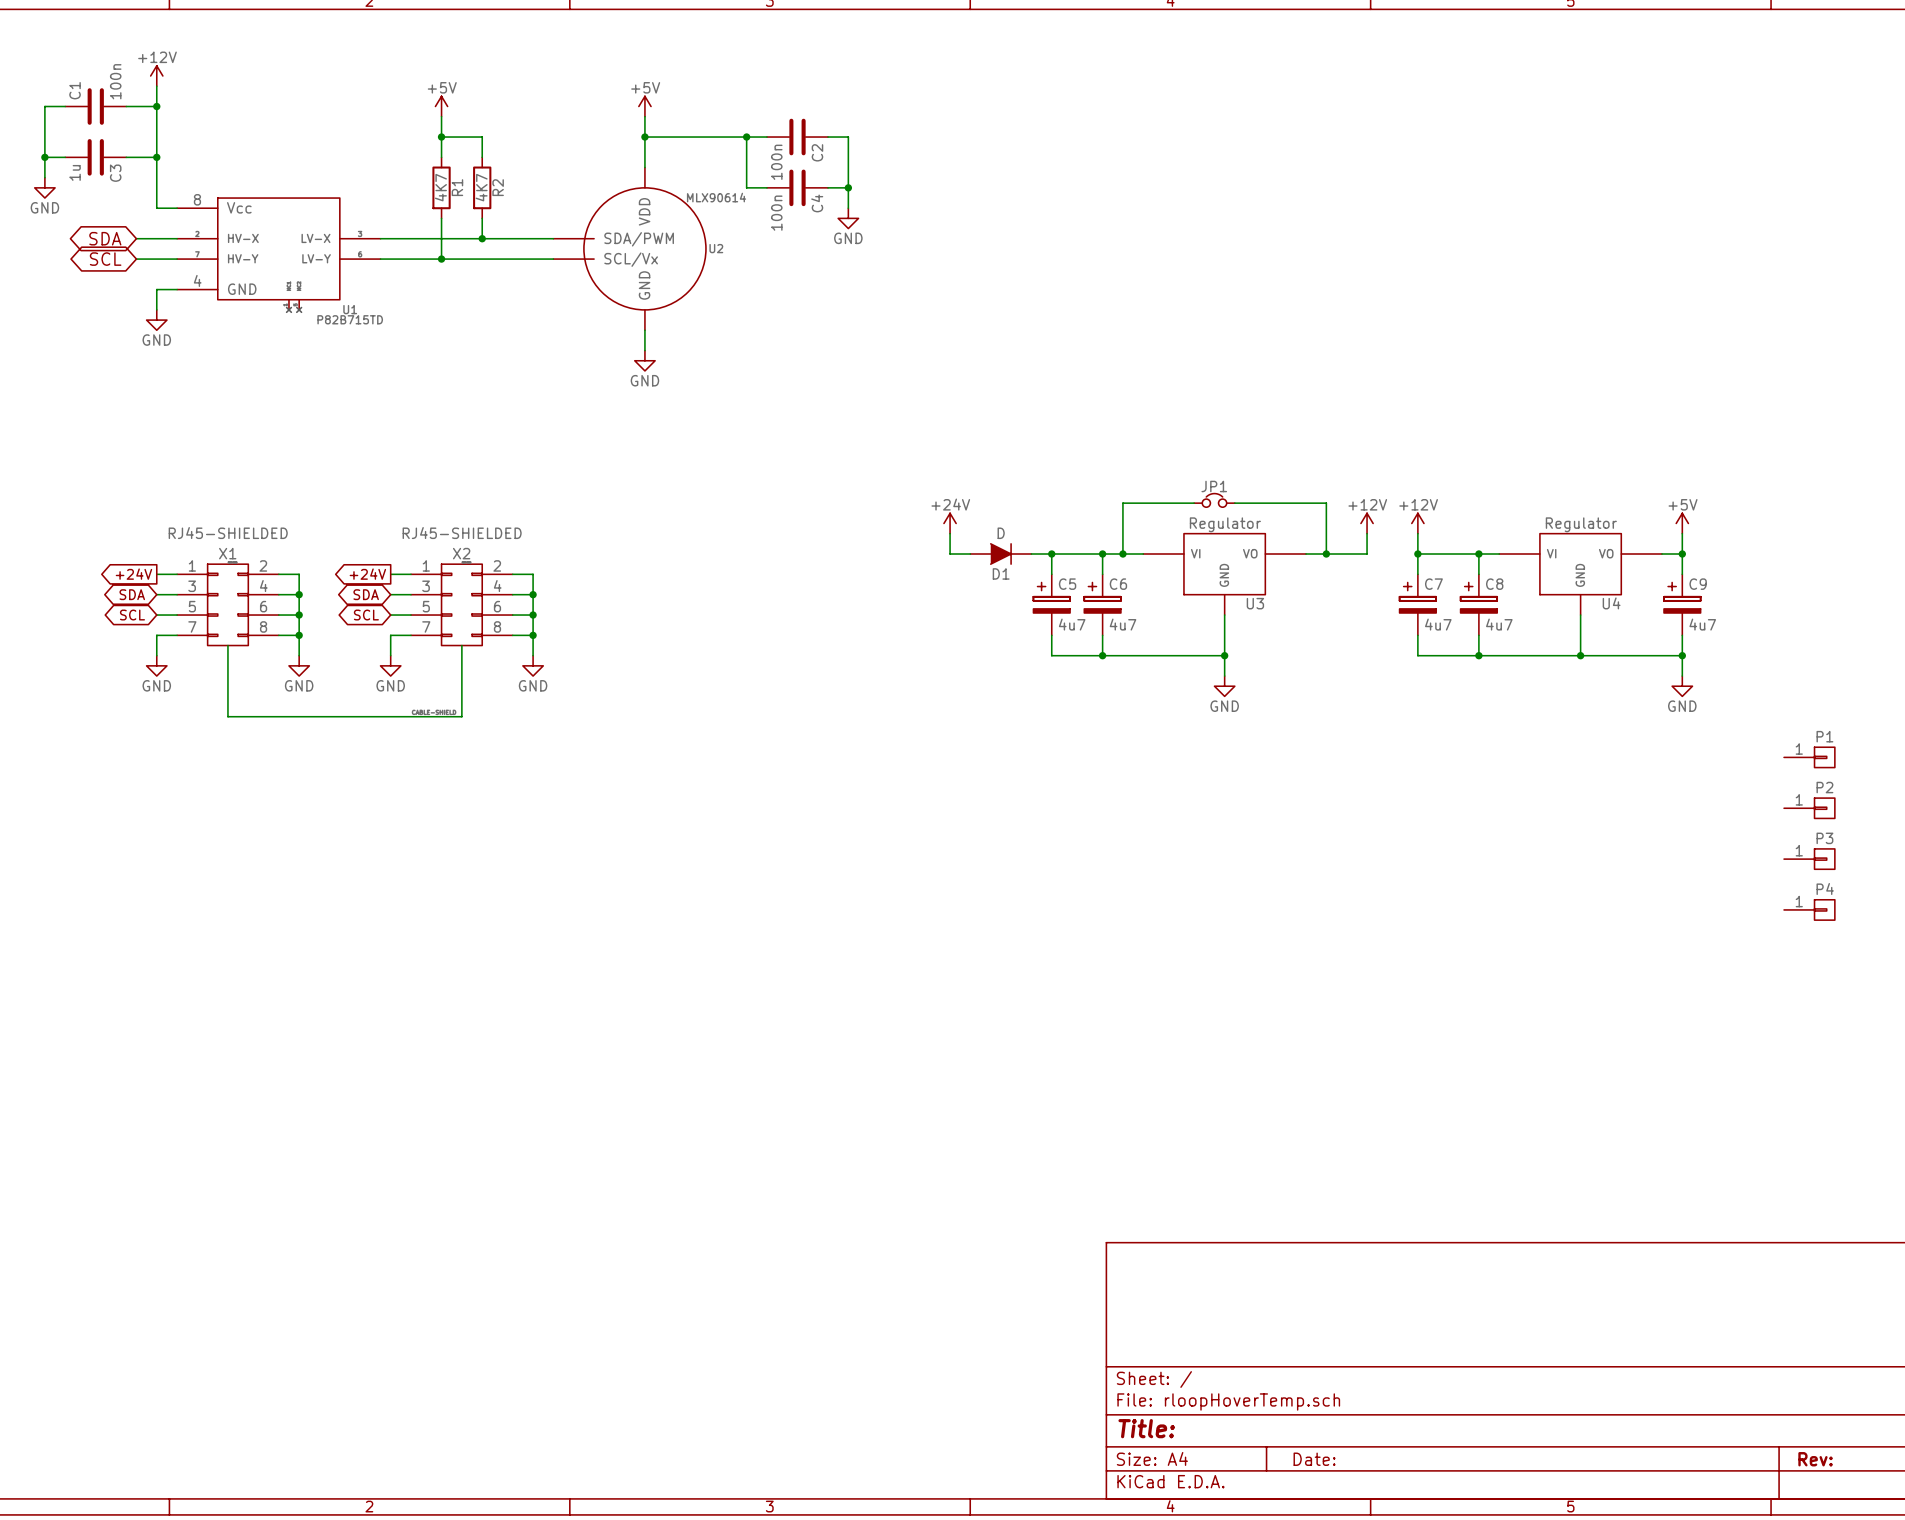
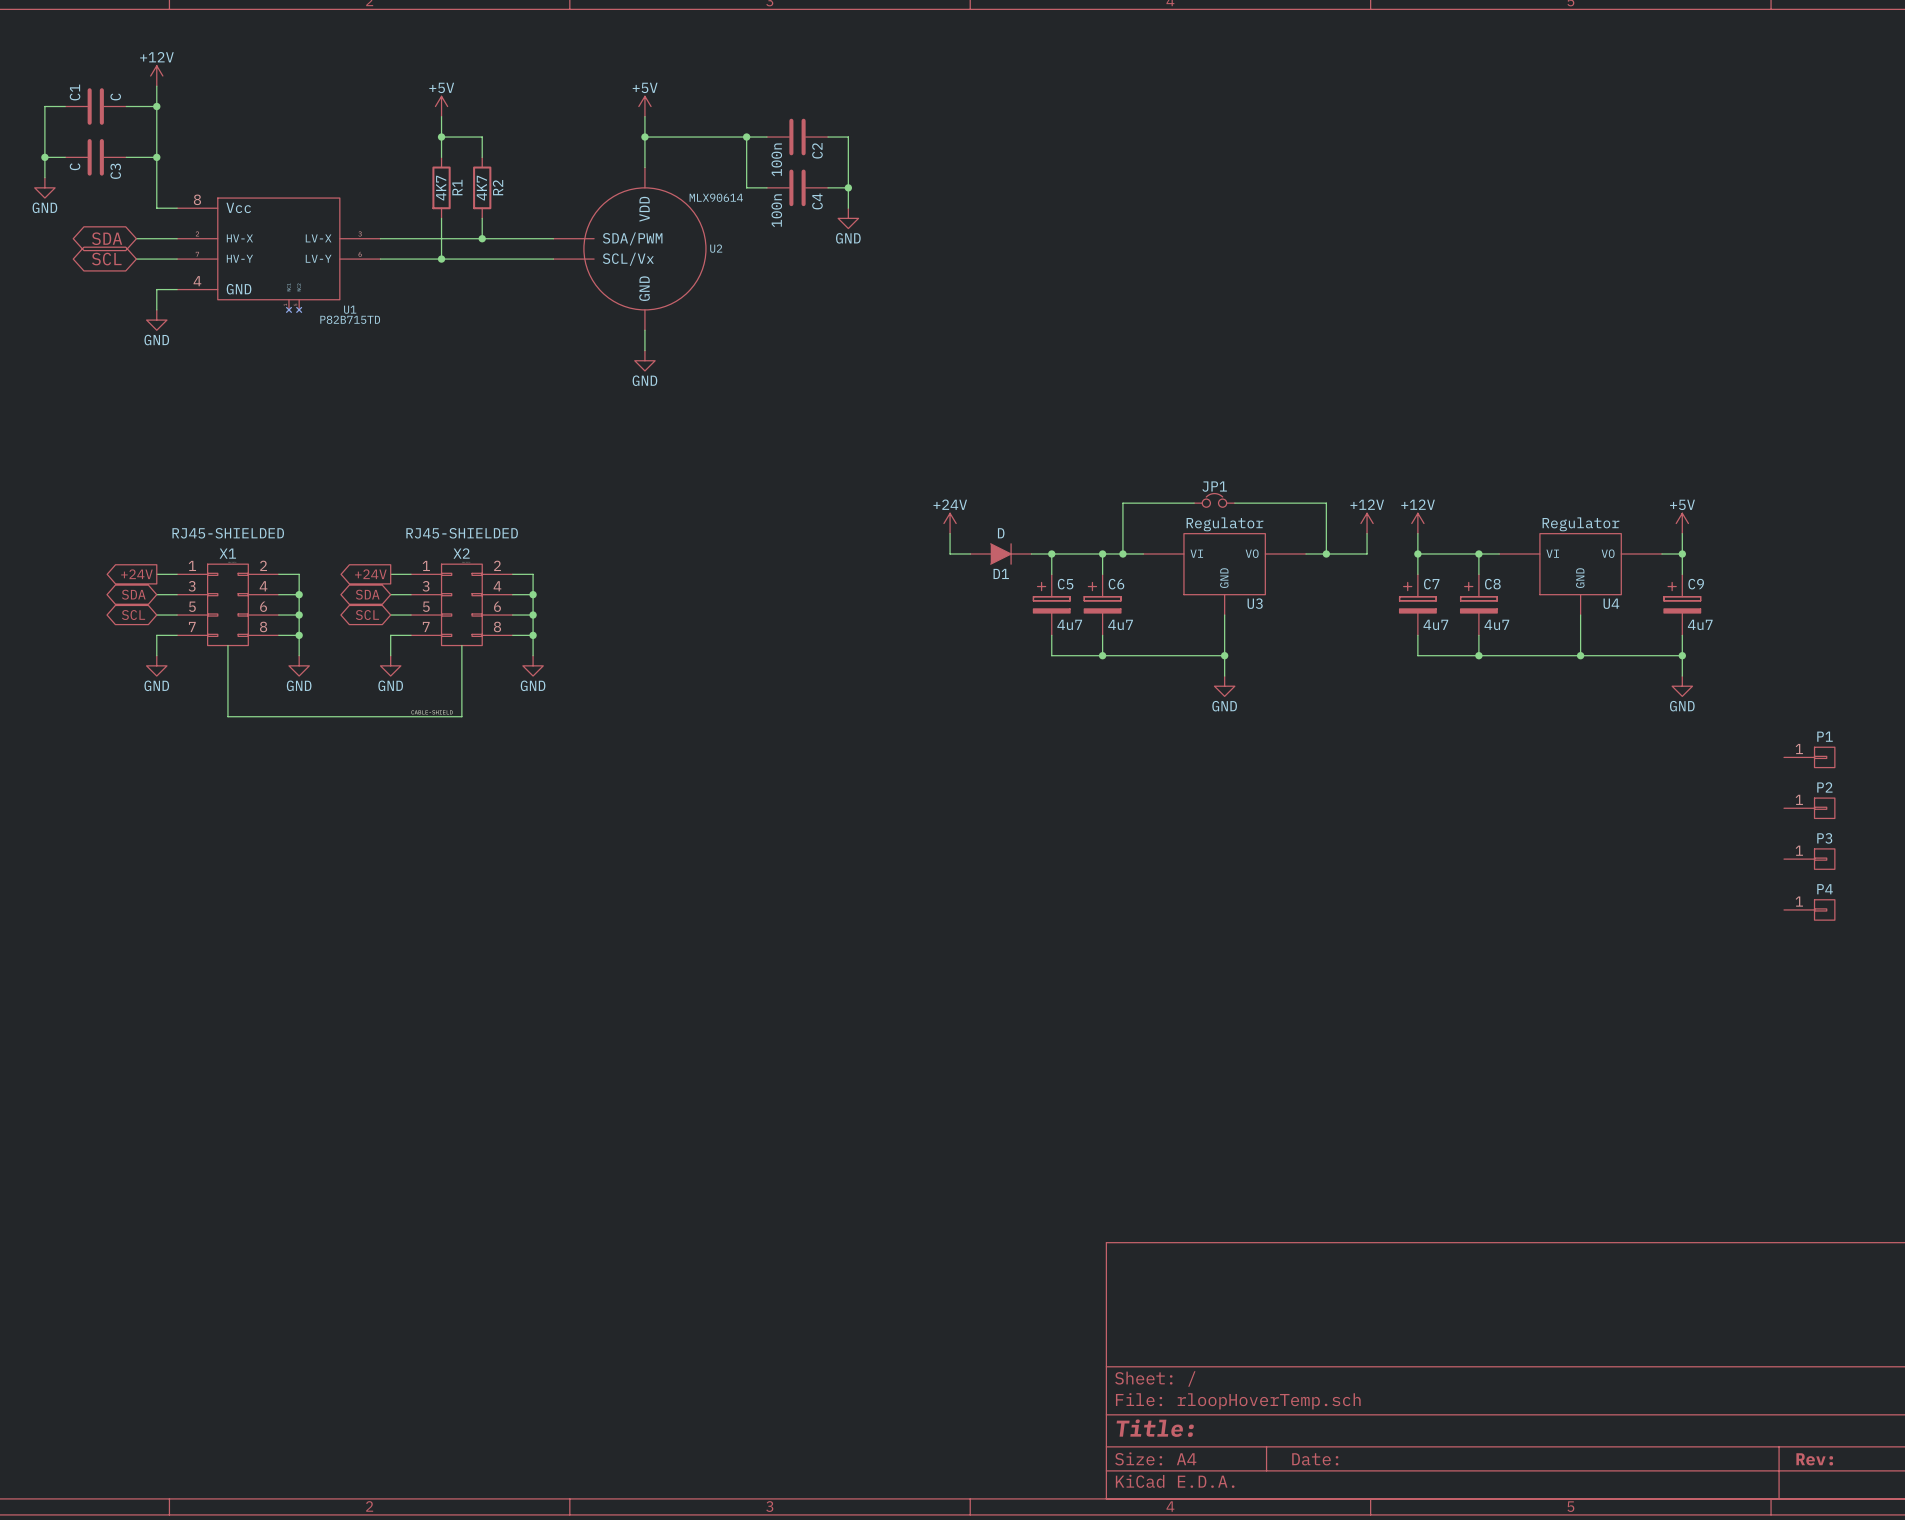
C1 value: 100n (115, 81) -> C (115, 96)
C3 value: 1u (75, 172) -> C (75, 166)

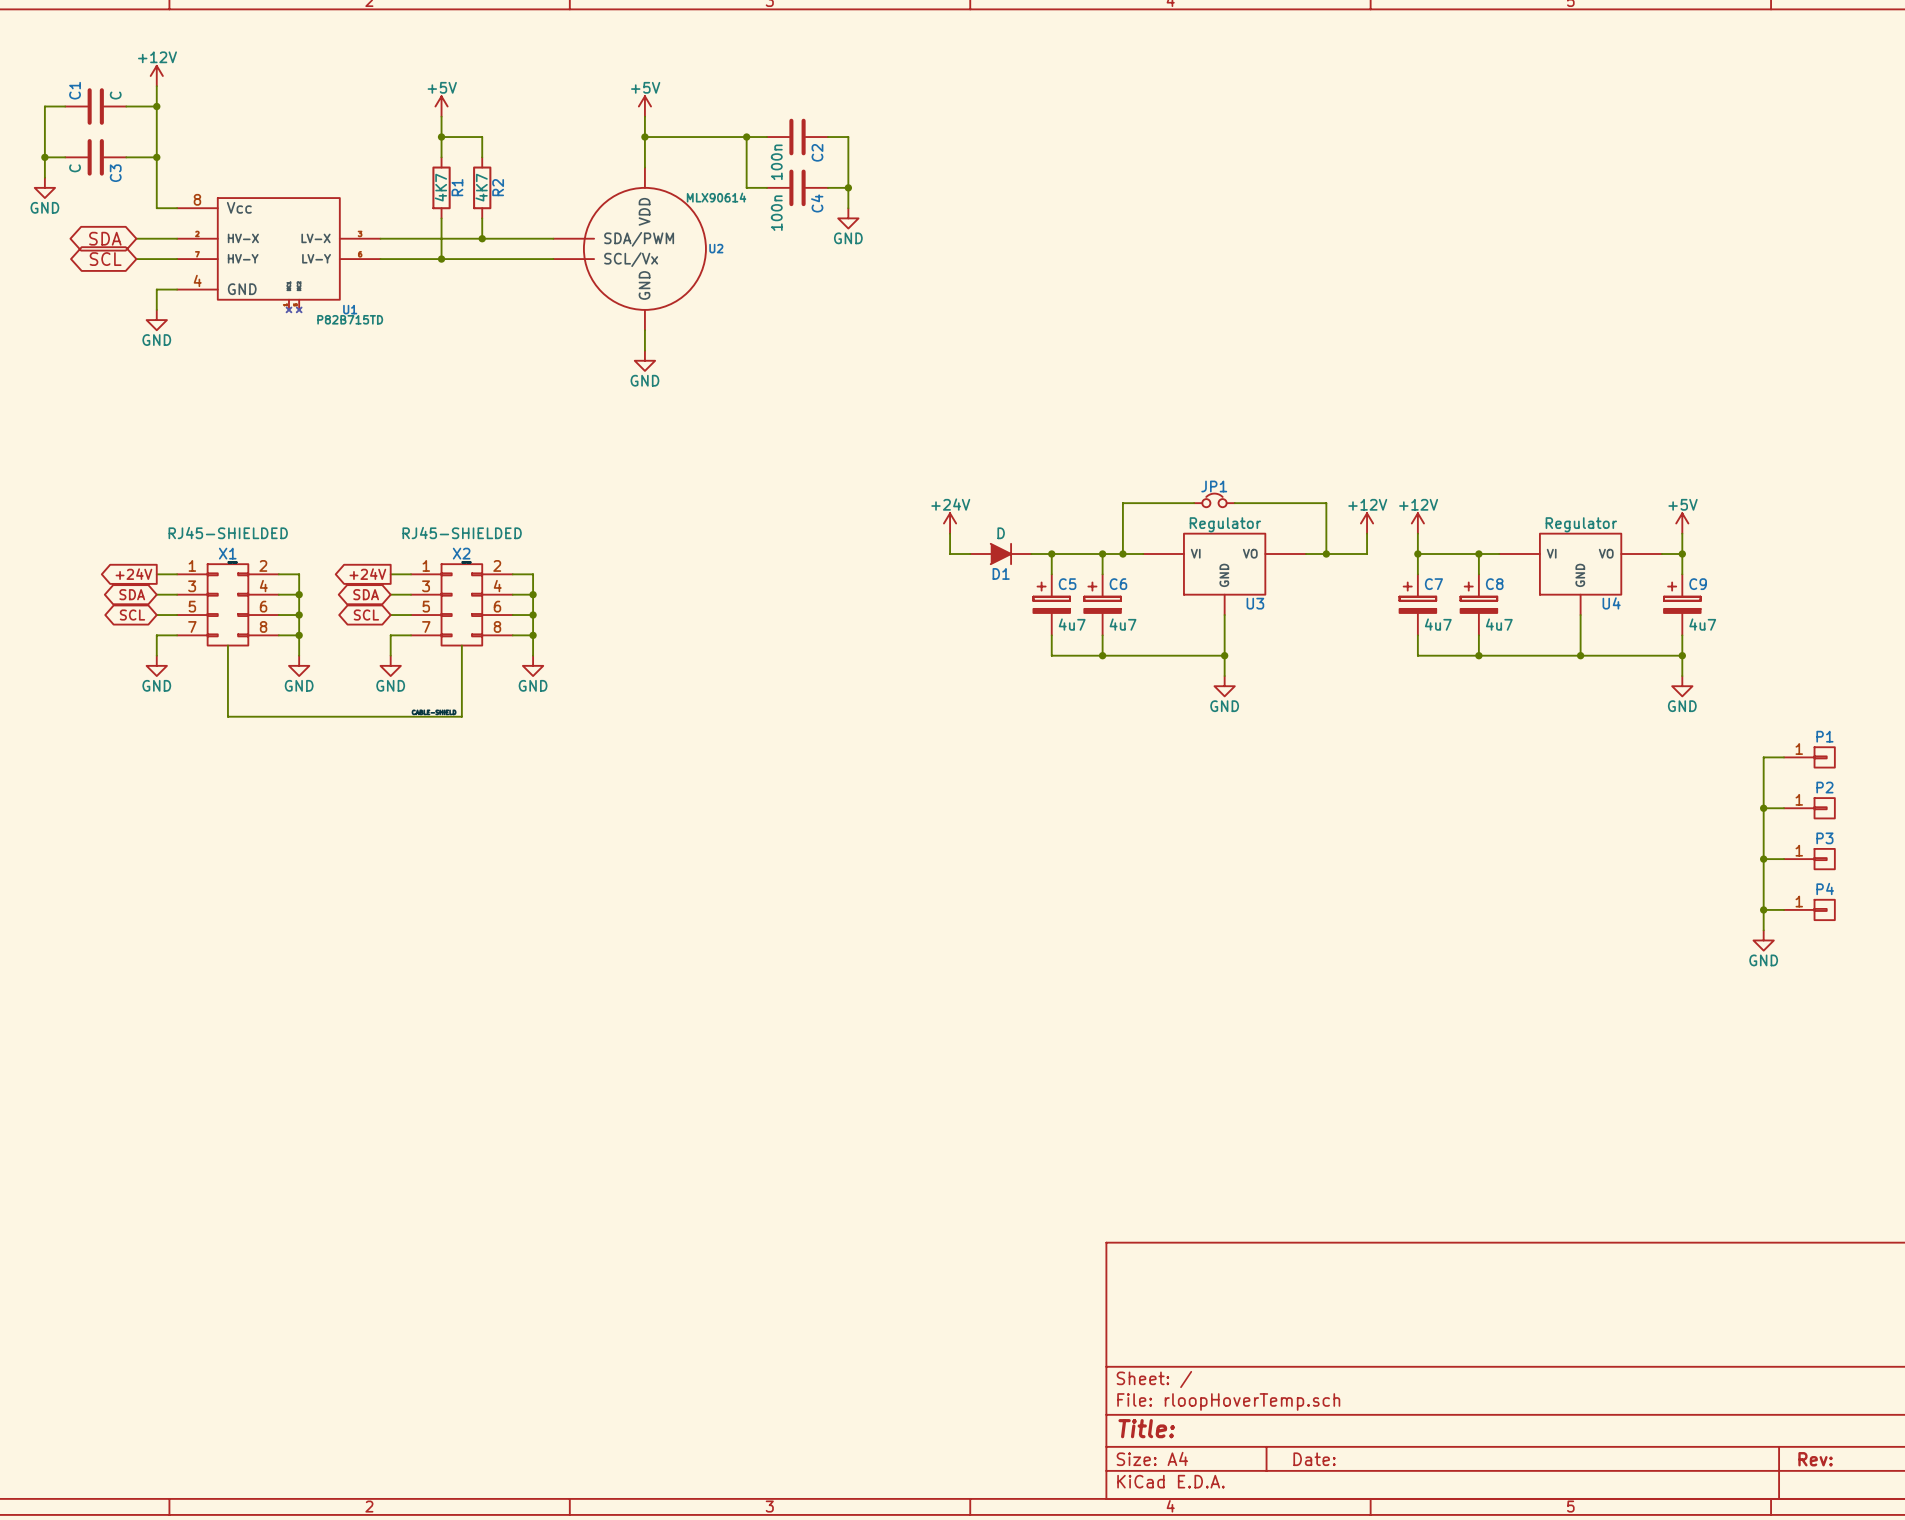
wire: none -> (1784, 757) (1763, 757) (1763, 930)
wire: none -> (1763, 808) (1784, 808)
junction: none -> (1763, 808)
wire: none -> (1763, 859) (1784, 859)
junction: none -> (1763, 859)
wire: none -> (1763, 909) (1784, 909)
junction: none -> (1763, 909)
power symbol: none -> GND (1763, 940)

